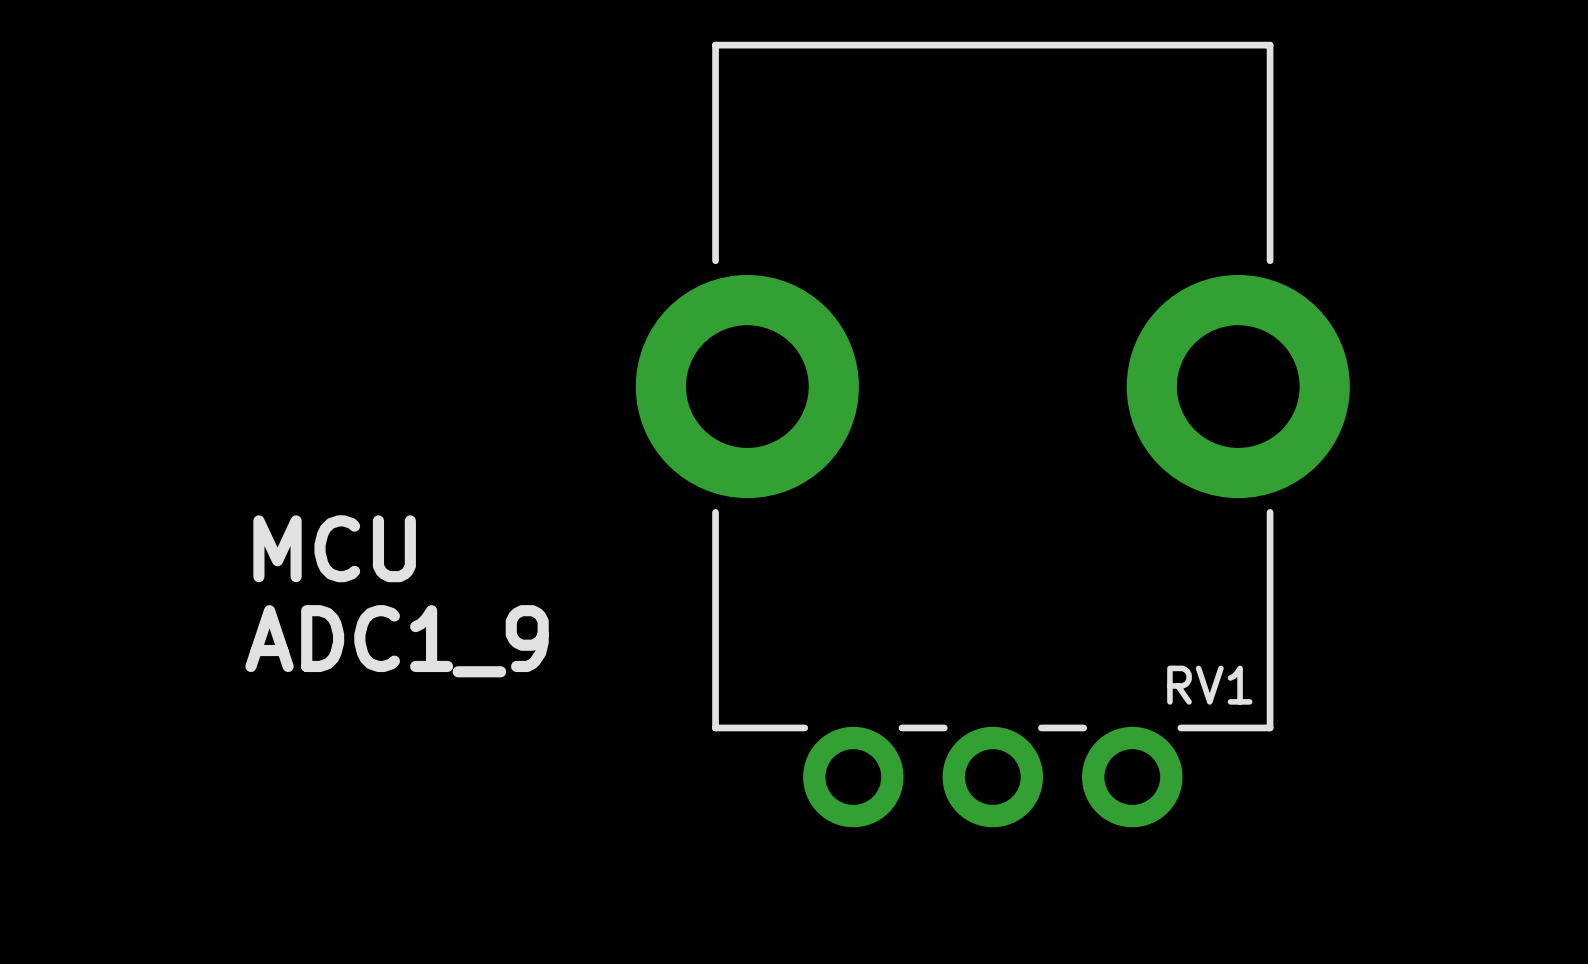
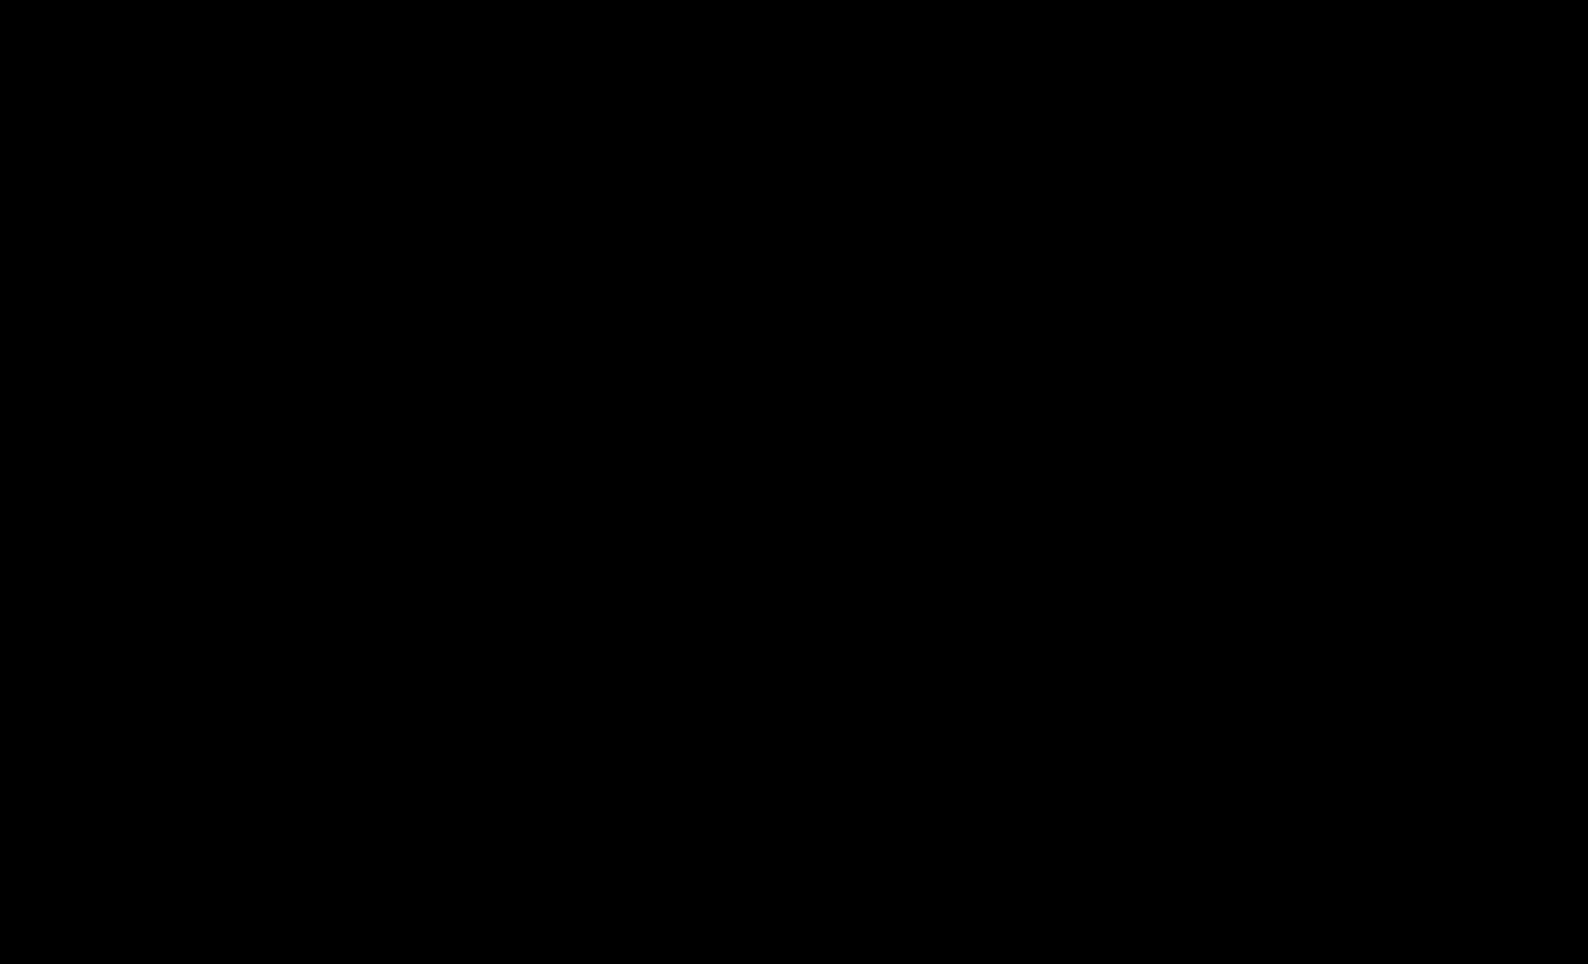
RV1: (992, 434) -> none
text: MCU (334, 548) -> none
text: ADC1_9 (397, 641) -> none

